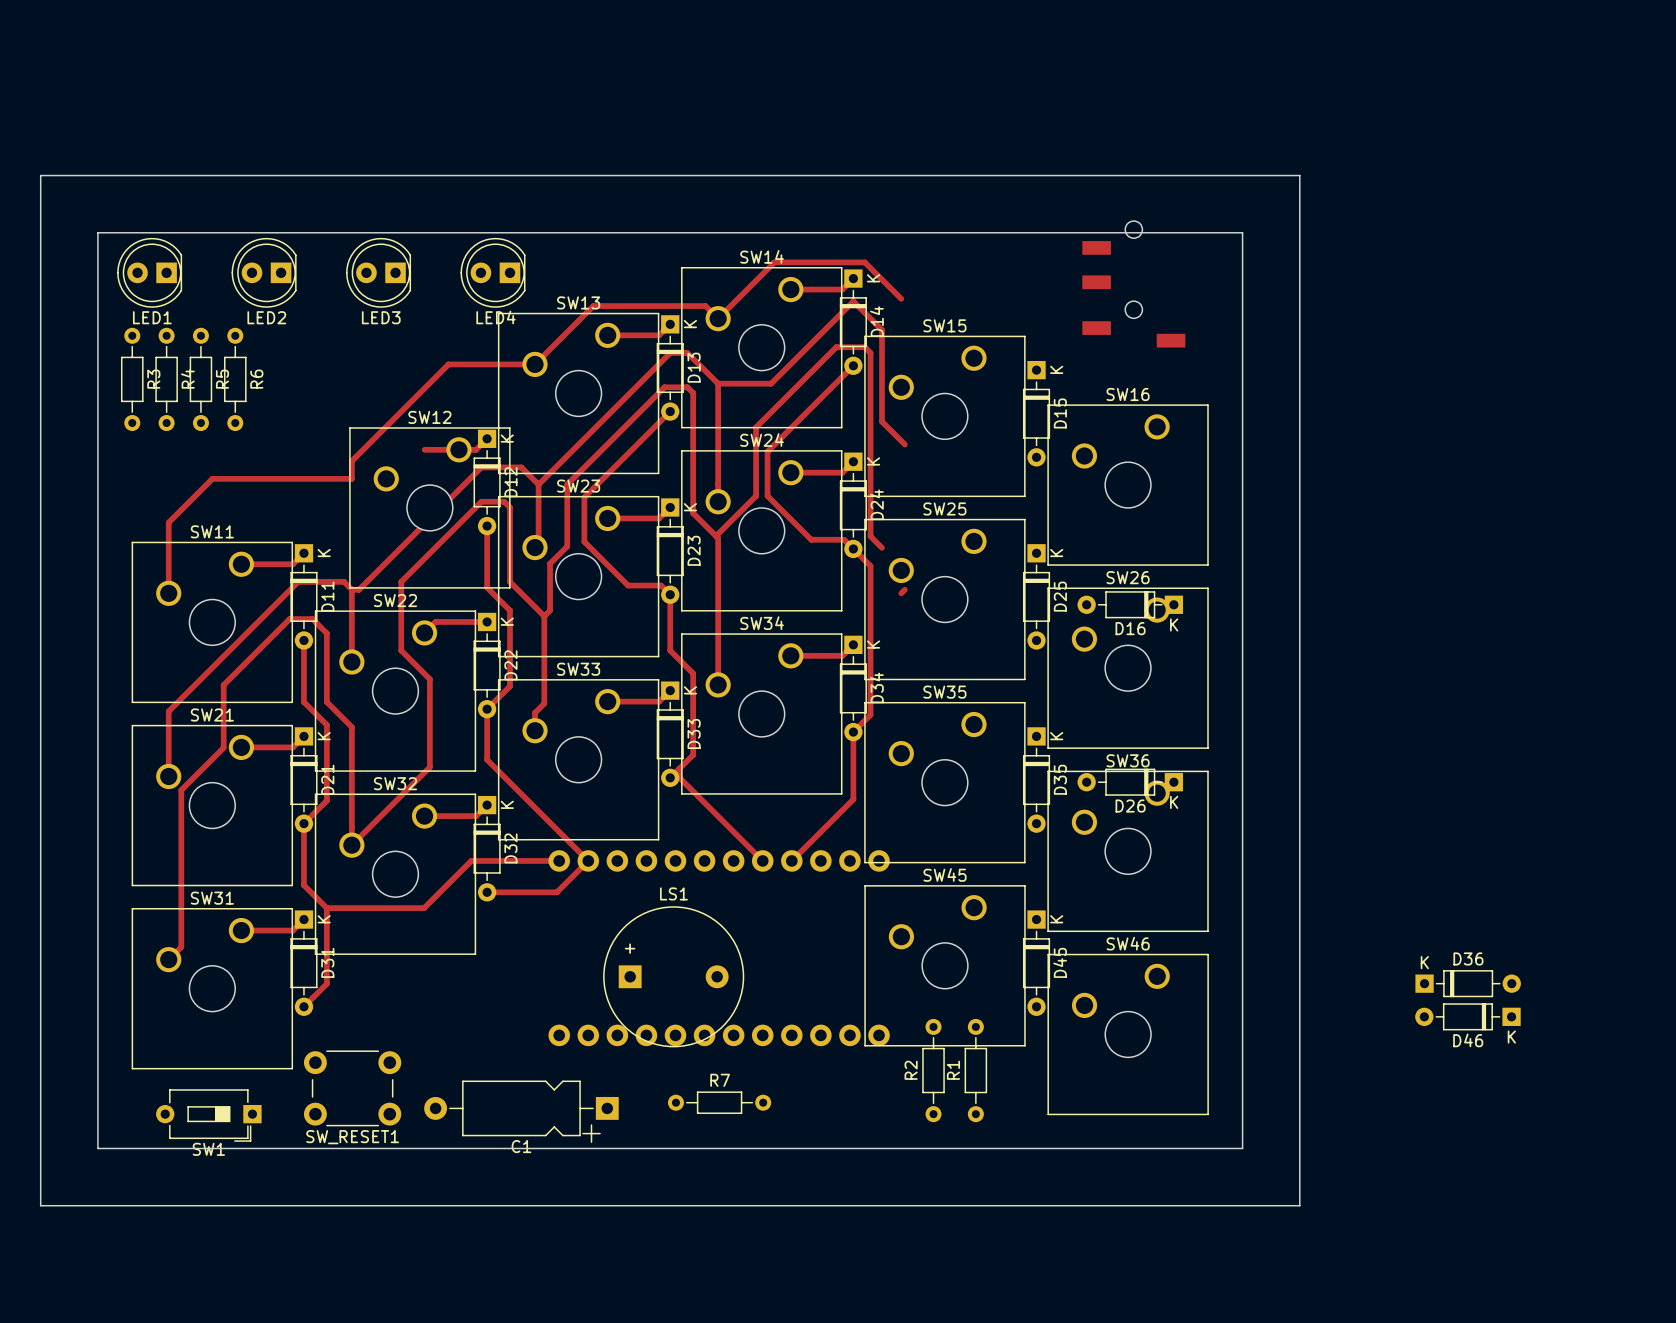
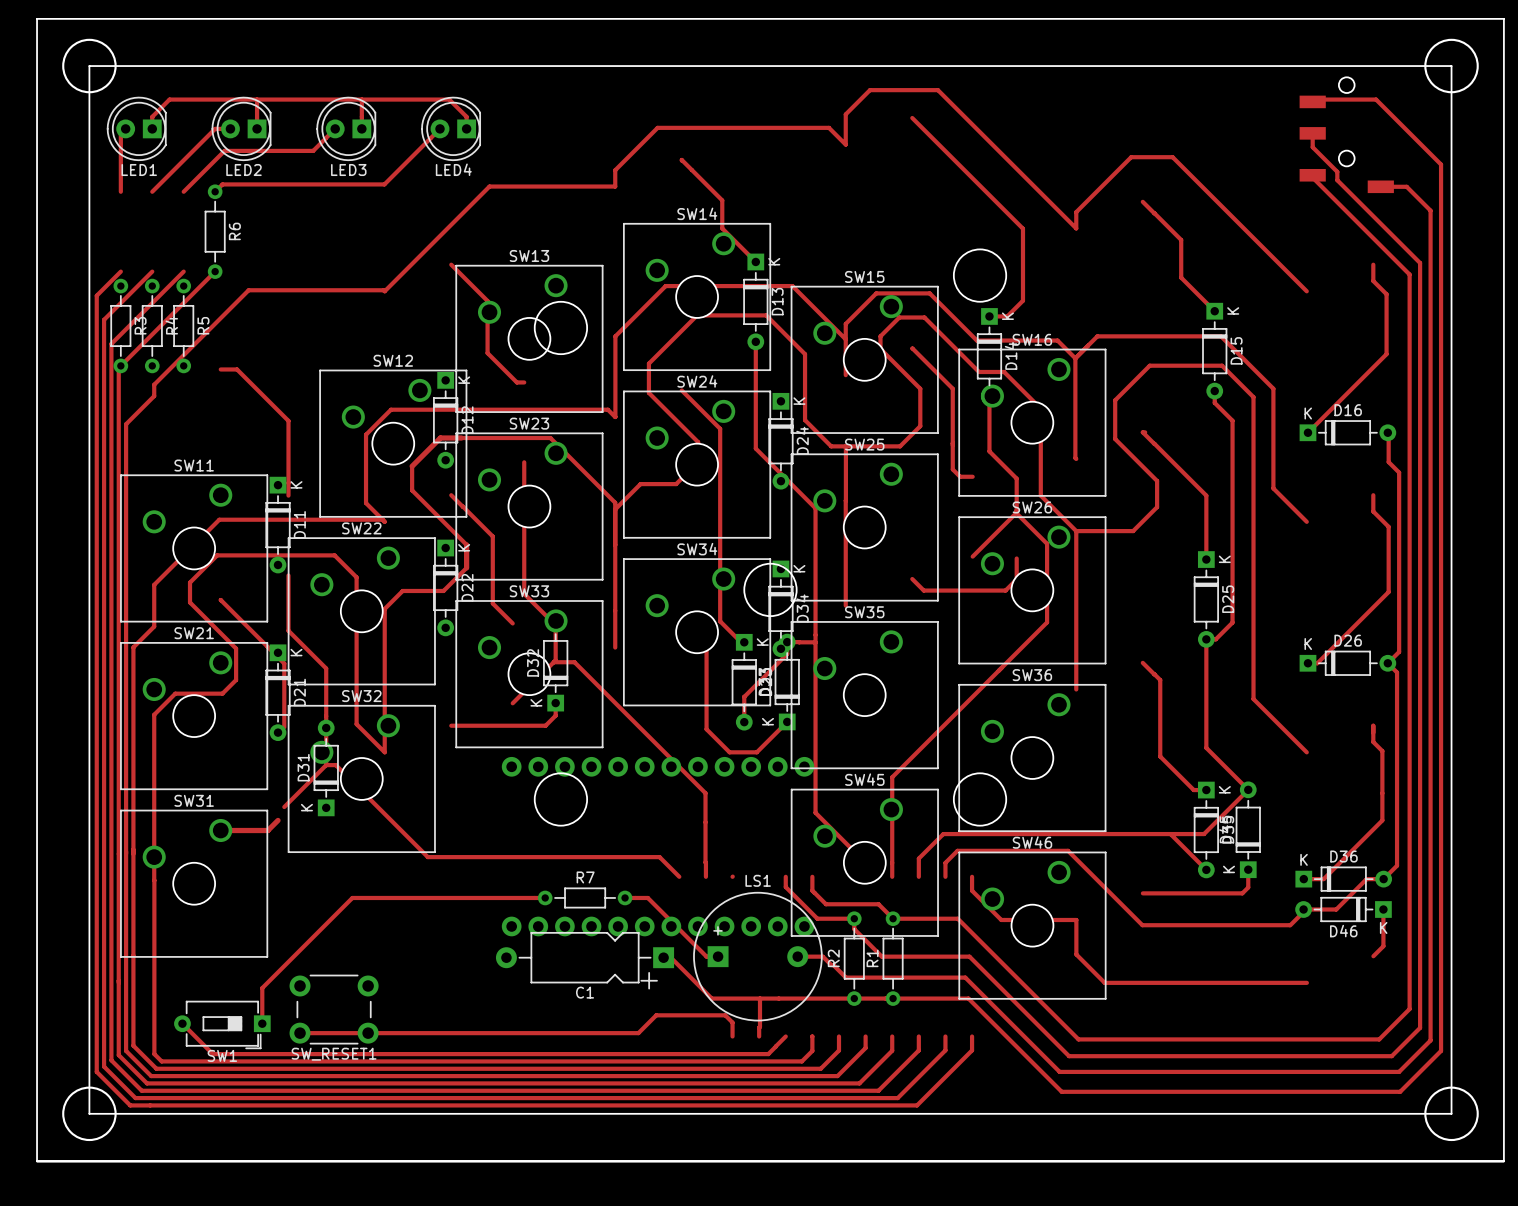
round board edge: none -> [62, 38, 117, 94]
round board edge: none -> [1424, 38, 1479, 94]
top track: none -> (257, 99) (257, 128)
top track: none -> (361, 99) (361, 128)
top track: none -> (1312, 101) (1315, 99) (1376, 99) (1441, 164) (1441, 1050) (1400, 1091) (1061, 1091) (968, 998) (711, 998) (670, 957) (663, 957)
top track: none -> (912, 118) (1022, 228) (1022, 300) (1007, 316) (989, 316)
top track: none -> (125, 128) (120, 133) (120, 191)
top track: none -> (152, 128) (152, 116) (169, 99) (449, 99) (466, 116) (466, 128)
top track: none -> (230, 128) (215, 128) (152, 191)
top track: none -> (335, 128) (313, 150) (224, 150) (183, 191)
top track: none -> (440, 128) (384, 184) (222, 184) (215, 191)
top track: none -> (1312, 133) (1312, 147) (1337, 171) (1337, 180) (1420, 263) (1420, 1027) (1391, 1056) (1069, 1056) (969, 956) (881, 956) (854, 929) (854, 918) (817, 918) (785, 887) (785, 876)
part: none -> (1346, 135)
board edge: (40, 175) (1299, 175) (1299, 1205) (40, 1205) -> (37, 1160) (37, 1082)
board edge: none -> (37, 139) (37, 18) (1503, 18) (1503, 1160)
top track: none -> (681, 160) (722, 200) (722, 228) (755, 261)
top track: none -> (1312, 175) (1312, 177) (1409, 274) (1409, 1009) (1379, 1039) (1078, 1039) (957, 918) (893, 918) (878, 904) (826, 904) (812, 890) (812, 876)
top track: none -> (1380, 186) (1406, 186) (1430, 210) (1430, 1040) (1399, 1071) (1059, 1071) (965, 977) (845, 977) (822, 956) (797, 956)
board edge: (97, 232) (1242, 232) (1242, 1148) (97, 1148) -> (89, 191) (89, 66) (1451, 66) (1451, 1113) (89, 1113) (89, 1029)
top track: none -> (1142, 201) (1181, 239) (1181, 277) (1214, 311)
LED1 position: (149, 272) -> (136, 128)
LED2 position: (264, 272) -> (241, 128)
LED3 position: (378, 272) -> (346, 128)
LED4 position: (493, 272) -> (451, 128)
top track: (853, 278) (842, 289) (790, 289) -> none
part: (1133, 284) -> none
round board edge: none -> [953, 248, 1007, 303]
top track: (901, 298) (864, 262) (774, 262) (718, 318) (705, 306) (593, 306) (535, 364) (448, 364) (351, 461) (351, 478) (212, 478) (168, 522) (168, 593) -> none
top track: none -> (451, 264) (487, 301) (487, 353) (516, 382) (524, 382)
top track: none -> (1373, 264) (1373, 281) (1386, 294) (1386, 354) (1307, 432)
top track: none -> (120, 271) (96, 295) (96, 1071) (130, 1105) (917, 1105) (972, 1050) (972, 1036)
top track: none -> (152, 271) (104, 319) (104, 1066) (135, 1098) (897, 1098) (945, 1050) (945, 1036)
top track: none -> (183, 271) (111, 343) (111, 1060) (141, 1090) (878, 1090) (918, 1050) (918, 1036)
top track: none -> (215, 271) (118, 368) (118, 1055) (147, 1083) (859, 1083) (892, 1050) (892, 1036)
D14 position: (853, 322) -> (989, 356)
top track: (670, 324) (659, 335) (607, 335) -> none
top track: none -> (1306, 291) (1172, 157) (1131, 157) (1076, 212) (1076, 228) (937, 90) (870, 90) (845, 114) (845, 144) (828, 127) (657, 127) (615, 170) (615, 186) (489, 186) (384, 291) (248, 290) (154, 384) (154, 396) (126, 424) (126, 1050) (151, 1076) (837, 1076) (865, 1048) (865, 1036)
round board edge: none -> [534, 301, 588, 355]
top track: (853, 365) (767, 451) (767, 496) (811, 539) (844, 539) (870, 566) (870, 714) (853, 732) (853, 799) (791, 860) -> none
D13 position: (670, 367) -> (755, 301)
R6 position: (235, 379) -> (215, 231)
top track: (718, 383) (718, 501) -> none
top track: (718, 383) (687, 352) (670, 352) (538, 484) -> none
top track: (718, 383) (771, 383) (853, 301) (882, 330) (882, 421) (904, 444) -> none
top track: none -> (845, 339) (792, 286) (665, 286) (615, 336) (615, 417) (607, 409) (391, 409) (366, 434) (366, 503) (384, 521)
top track: none -> (757, 343) (755, 341) (755, 448) (815, 508) (815, 812) (865, 862) (865, 876)
top track: none -> (912, 348) (952, 388) (952, 469) (960, 476) (972, 476)
top track: (670, 411) (584, 497) (584, 541) (628, 585) (661, 585) (670, 594) (670, 650) (693, 673) (693, 754) (670, 777) -> none
D15 position: (1036, 413) -> (1214, 351)
top track: none -> (1075, 358) (1097, 336) (1221, 336) (1273, 388) (1273, 488) (1306, 521)
top track: none -> (1075, 358) (1076, 458)
top track: none -> (1075, 358) (1057, 340) (976, 340) (929, 293) (876, 293) (845, 323) (845, 375)
top track: none -> (220, 369) (237, 369) (288, 420) (288, 495)
top track: (487, 438) (476, 449) (424, 449) -> none
top track: none -> (681, 390) (720, 428) (720, 621) (737, 639)
top track: none -> (1214, 391) (1214, 402) (1232, 420) (1232, 622) (1215, 639) (1206, 639) (1206, 747) (1248, 789) (1204, 834) (943, 834) (918, 858) (918, 876)
top track: none -> (989, 396) (989, 451) (1016, 478) (1016, 513) (1047, 543) (1047, 622) (892, 777) (892, 876)
top track: (853, 461) (842, 472) (790, 472) -> none
top track: (538, 484) (538, 543) (535, 547) -> none
top track: (538, 484) (521, 467) (481, 467) (359, 589) (351, 589) -> none
top track: none -> (1145, 432) (1142, 432) (1206, 495) (1206, 559)
top track: none -> (1387, 432) (1388, 462) (1399, 472) (1399, 651) (1387, 663) (1397, 672) (1397, 865) (1383, 879) (1366, 879) (1336, 909) (1303, 909)
top track: (504, 501) (510, 507) (510, 581) (544, 616) -> (461, 438) (550, 438) (615, 502) (615, 647)
top track: (670, 507) (659, 518) (607, 518) -> none
top track: none -> (845, 446) (845, 605)
top track: (487, 526) (487, 587) (510, 610) (510, 618) -> (412, 466) (412, 490) (466, 544)
top track: none -> (524, 462) (524, 593) (555, 625)
top track: (450, 532) (401, 581) (401, 650) (429, 679) (429, 767) (351, 845) (351, 727) (326, 702) (326, 633) (312, 619) (289, 619) (223, 685) (223, 747) (181, 790) (181, 947) (168, 959) -> none
top track: (716, 536) (756, 496) (756, 427) (836, 347) (864, 347) (870, 352) (870, 536) (882, 547) -> none
D23 position: (670, 551) -> (744, 682)
top track: (303, 553) (292, 564) (241, 564) -> none
top track: none -> (451, 495) (492, 536) (492, 603) (512, 623)
top track: none -> (1373, 495) (1373, 511) (1388, 526) (1388, 592) (1317, 663) (1307, 663)
top track: none -> (615, 509) (640, 484) (676, 484) (698, 462) (698, 442) (648, 392) (648, 363) (697, 315) (766, 315) (805, 354) (805, 420) (831, 446) (900, 446) (920, 426) (920, 388) (880, 348) (880, 336) (899, 317) (924, 317) (978, 371) (1004, 371) (1040, 408) (1040, 495) (1076, 531)
top track: none -> (1016, 512) (972, 556)
top track: (351, 589) (351, 662) -> none
top track: (351, 589) (344, 581) (298, 581) (168, 711) (168, 776) -> none
top track: (904, 589) (901, 593) -> none
top track: none -> (382, 519) (219, 519) (154, 584) (154, 626) (133, 647) (133, 1045) (156, 1068) (820, 1068) (839, 1050) (839, 1036)
D25 position: (1036, 596) -> (1206, 599)
top track: none -> (1076, 531) (1076, 689)
top track: none -> (1076, 531) (1133, 531) (1157, 507) (1157, 480) (1115, 439) (1115, 400) (1149, 365) (1222, 365) (1253, 397) (1253, 699) (1306, 752)
D16 rotation: 0° (1130, 604) -> 180° (1347, 432)
D16 position: (1130, 604) -> (1347, 432)
top track: (544, 616) (544, 703) (535, 712) (535, 730) -> none
top track: (544, 616) (550, 610) (550, 563) (567, 546) (567, 484) (664, 387) (687, 387) (693, 393) (693, 513) (718, 538) (718, 684) -> none
top track: (487, 621) (435, 621) (424, 632) -> none
top track: none -> (1016, 558) (1016, 579) (1005, 590) (923, 590) (912, 579)
round board edge: none -> [743, 563, 798, 617]
top track: (303, 640) (303, 702) (326, 724) (326, 800) (303, 823) (303, 885) (326, 908) -> none
top track: (510, 643) (510, 686) (487, 709) (487, 759) (588, 860) (556, 892) (487, 892) -> (466, 567) (443, 590) (402, 590) (384, 608) (384, 752) (356, 724) (356, 577) (334, 555) (217, 555) (190, 582) (190, 602) (236, 648) (236, 680) (222, 693) (175, 693) (154, 714) (154, 1054) (161, 1061) (801, 1061) (812, 1050) (812, 1036)
top track: (853, 644) (842, 655) (790, 655) -> none
top track: none -> (288, 575) (288, 630) (326, 668) (326, 765)
top track: none -> (220, 599) (284, 663) (284, 727)
top track: (670, 690) (659, 701) (607, 701) -> none
top track: none -> (681, 620) (706, 645) (706, 729) (729, 752) (756, 752) (787, 721)
top track: none -> (555, 623) (555, 660) (512, 703)
top track: none -> (815, 642) (787, 642) (787, 653) (744, 696)
D33 rotation: 0° (670, 734) -> 180° (787, 682)
D33 position: (670, 734) -> (787, 682)
top track: (303, 736) (292, 747) (241, 747) -> none
top track: none -> (553, 662) (574, 662) (705, 793) (705, 876)
top track: none -> (1142, 662) (1160, 680) (1160, 756) (1193, 790) (1206, 790)
top track: (679, 768) (679, 777) (762, 860) -> none
D35 position: (1036, 780) -> (1206, 829)
D26 rotation: 0° (1130, 782) -> 180° (1347, 663)
D26 position: (1130, 782) -> (1347, 663)
top track: none -> (744, 696) (744, 722)
top track: none -> (555, 703) (555, 715) (545, 725) (451, 725)
top track: (487, 805) (476, 816) (424, 816) -> none
top track: none -> (1373, 725) (1373, 742) (1382, 751) (1382, 820) (1323, 879) (1303, 879)
D32 rotation: 0° (487, 848) -> 180° (555, 663)
D32 position: (487, 848) -> (555, 663)
top track: none -> (326, 765) (335, 765) (427, 857) (659, 857) (679, 876)
top track: none -> (326, 765) (284, 807)
top track: (559, 860) (471, 860) (424, 908) (326, 908) -> none
round board edge: none -> [534, 772, 588, 827]
round board edge: none -> [953, 772, 1007, 827]
top track: (326, 908) (326, 983) (303, 1006) -> none
top track: none -> (1170, 834) (1206, 869)
D31 rotation: 0° (303, 963) -> 180° (326, 767)
D31 position: (303, 963) -> (326, 767)
D45 rotation: 0° (1036, 963) -> 180° (1248, 829)
D45 position: (1036, 963) -> (1248, 829)
top track: none -> (1248, 869) (1248, 887) (1242, 893) (1142, 893)
LS1 position: (673, 976) -> (757, 956)
top track: none -> (732, 876) (732, 876)
top track: none -> (945, 876) (945, 862) (957, 850) (1068, 850) (1142, 925) (1289, 925)
top track: none -> (972, 876) (972, 890) (1001, 919) (1076, 919) (1076, 954) (1104, 982) (1306, 982)
top track: none -> (545, 897) (352, 897) (262, 988) (262, 1023)
top track: none -> (625, 897) (647, 897) (706, 956) (718, 956)
top track: none -> (1383, 909) (1383, 946) (1373, 956)
top track: none -> (1303, 911) (1290, 925)
SW_RESET1 position: (352, 1088) -> (334, 1009)
R7 position: (719, 1102) -> (585, 897)
C1 position: (521, 1111) -> (585, 960)
top track: none -> (759, 998) (759, 1036)
SW1 position: (208, 1115) -> (222, 1024)
top track: none -> (182, 1023) (212, 1054) (768, 1054) (775, 1046)
top track: none -> (300, 1033) (638, 1033) (656, 1015) (725, 1015) (732, 1022) (732, 1036)
top track: none -> (785, 1036) (775, 1046)
round board edge: none -> [62, 1086, 117, 1142]
round board edge: none -> [1424, 1086, 1479, 1142]
board edge: none -> (36, 1161) (1503, 1161)

